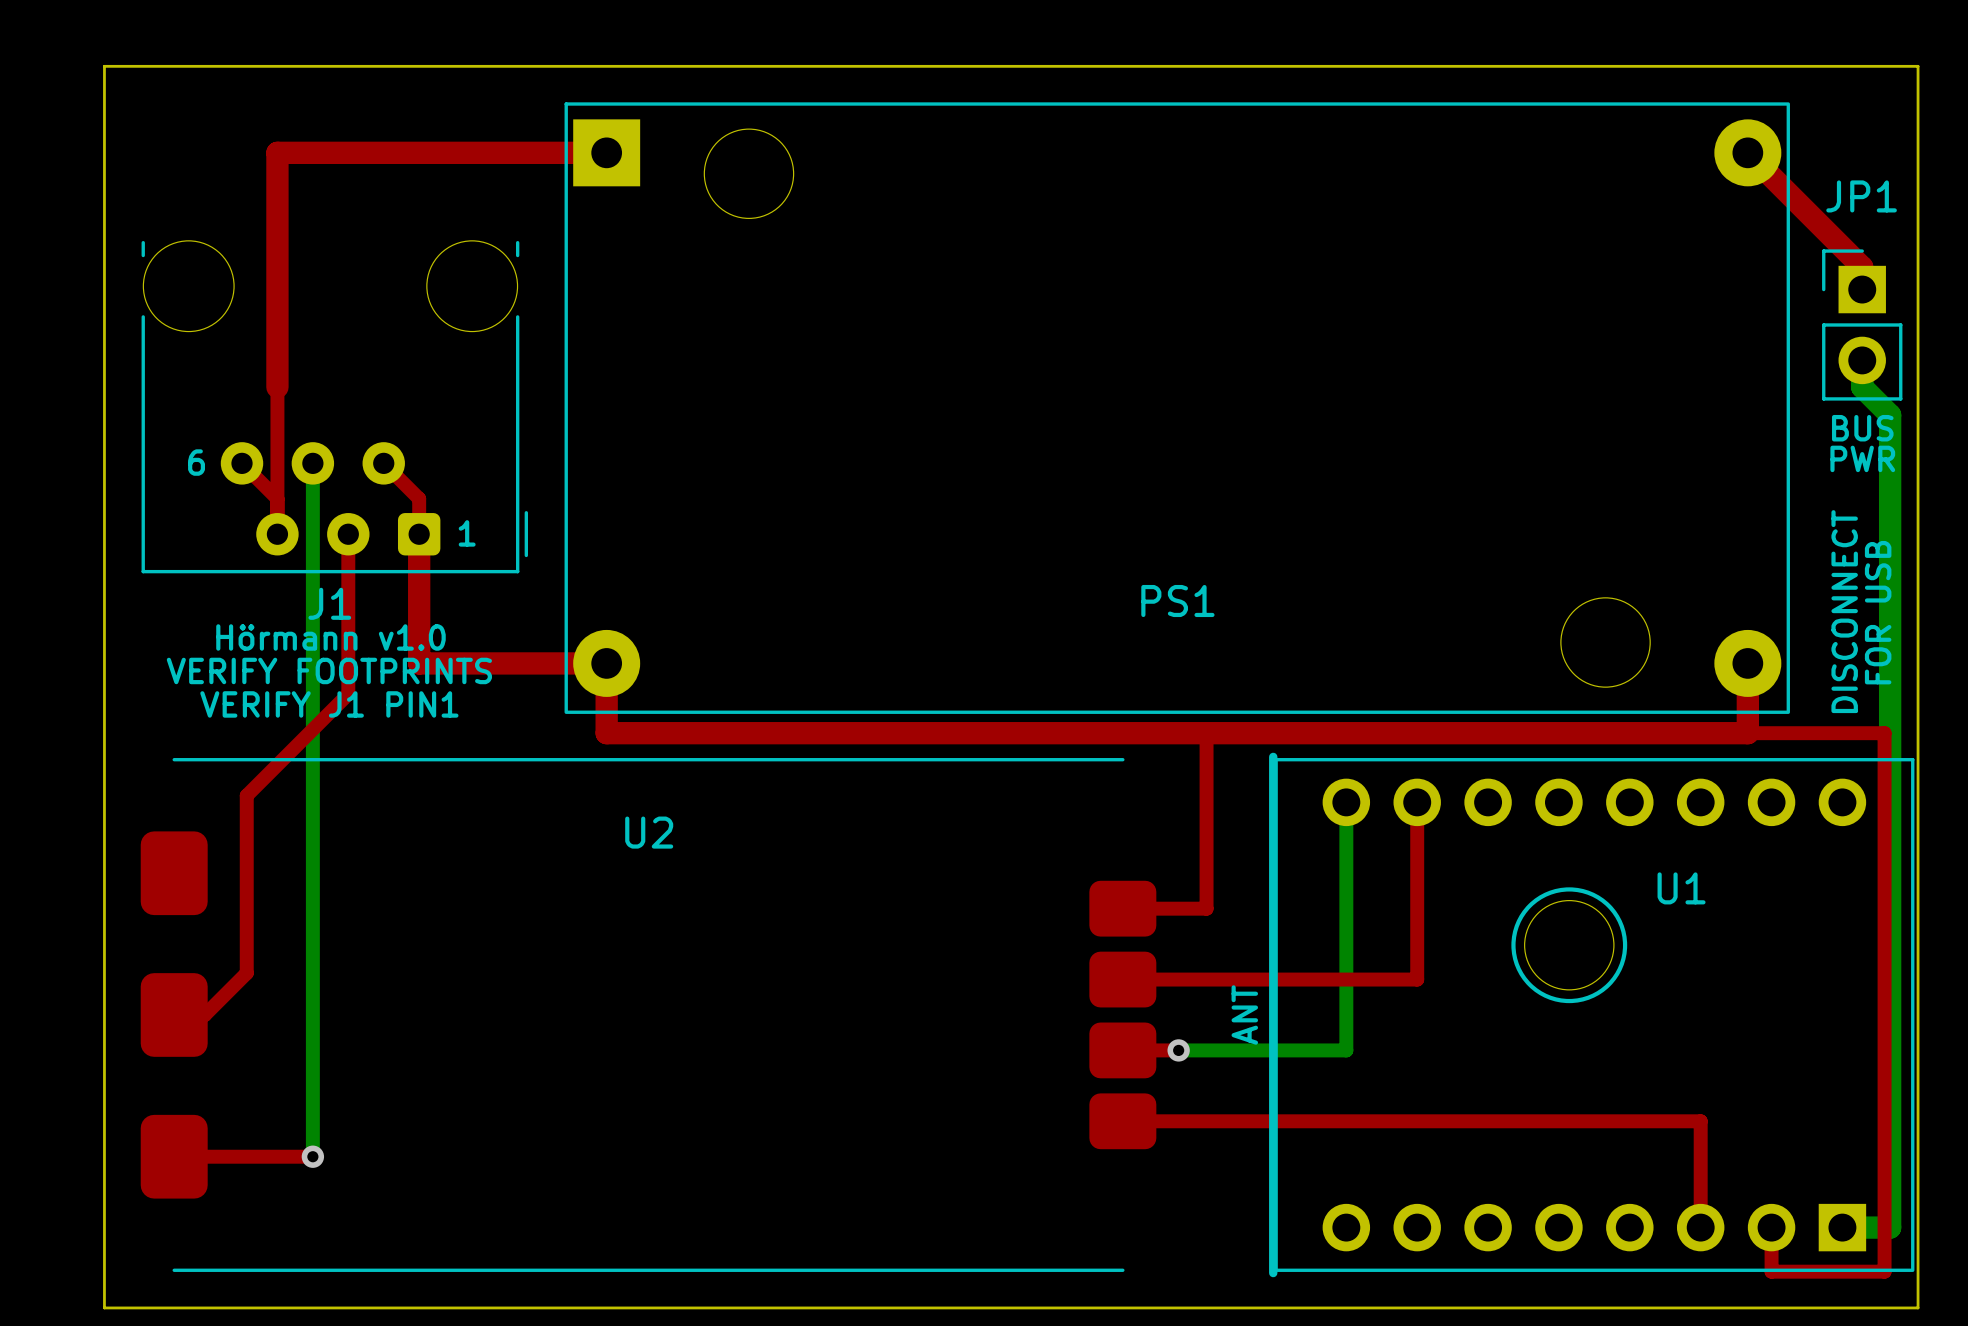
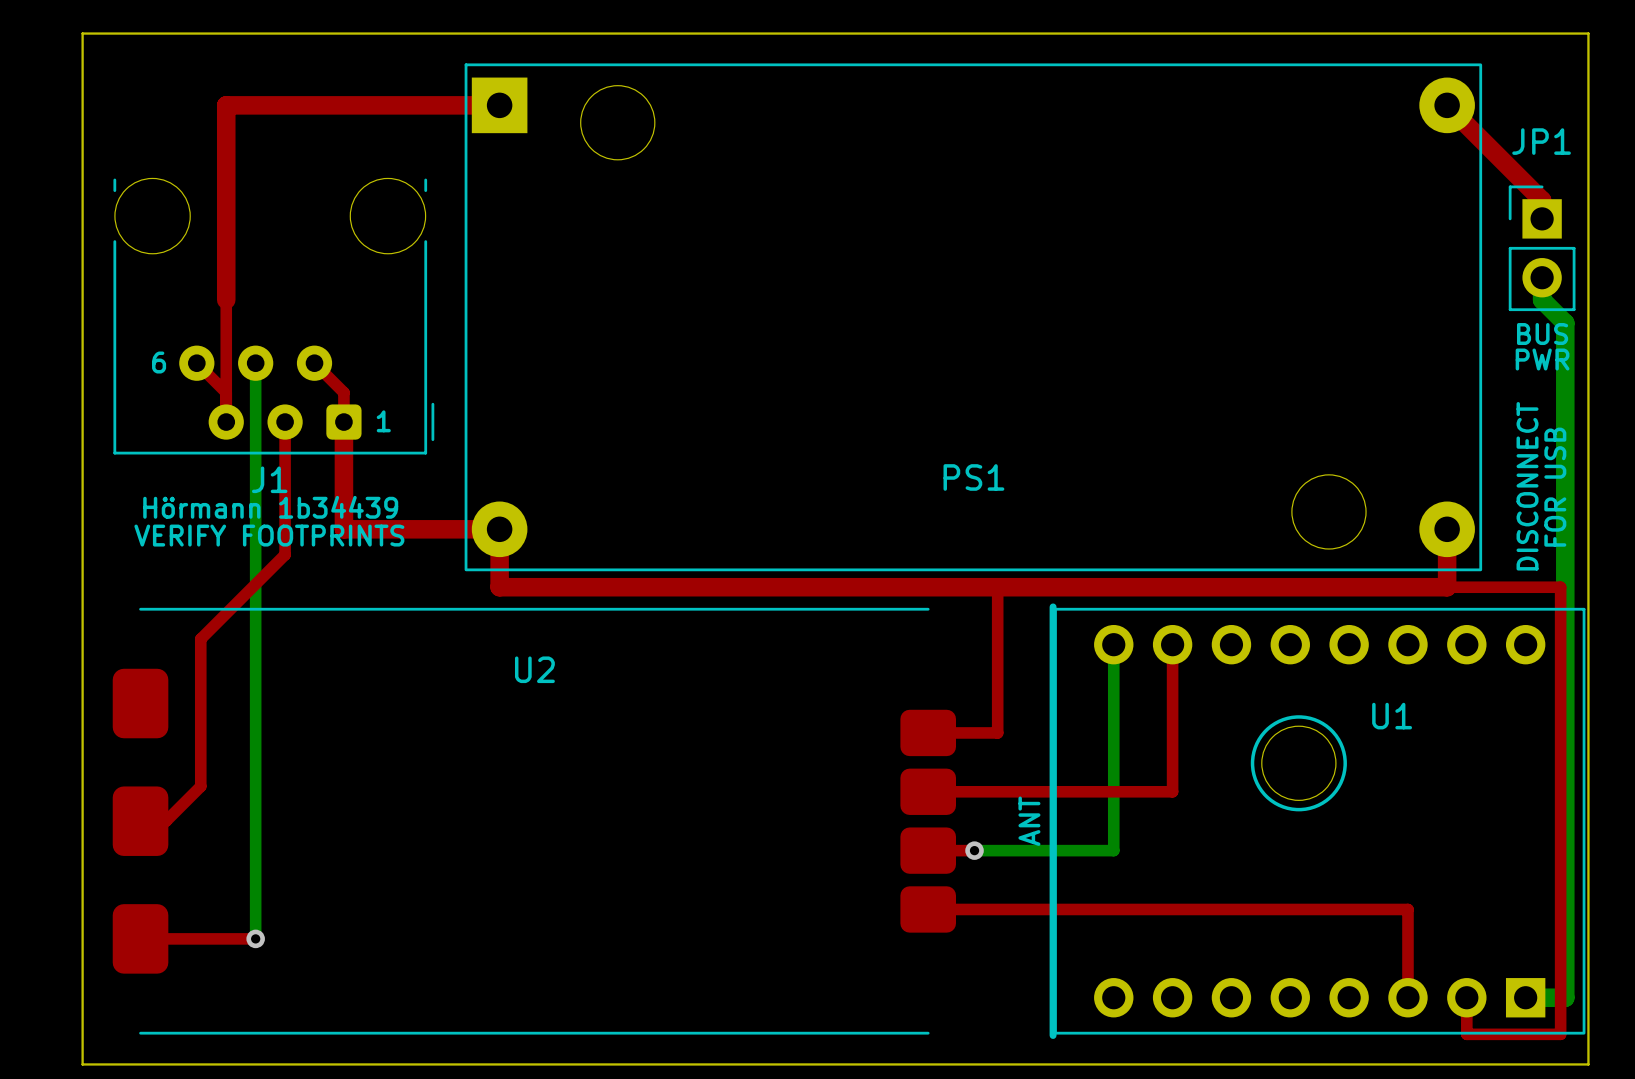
text: Hörmann v1.0 (330, 637) -> Hörmann 1b34439 (270, 507)
text: VERIFY J1 PIN1 (329, 704) -> none

